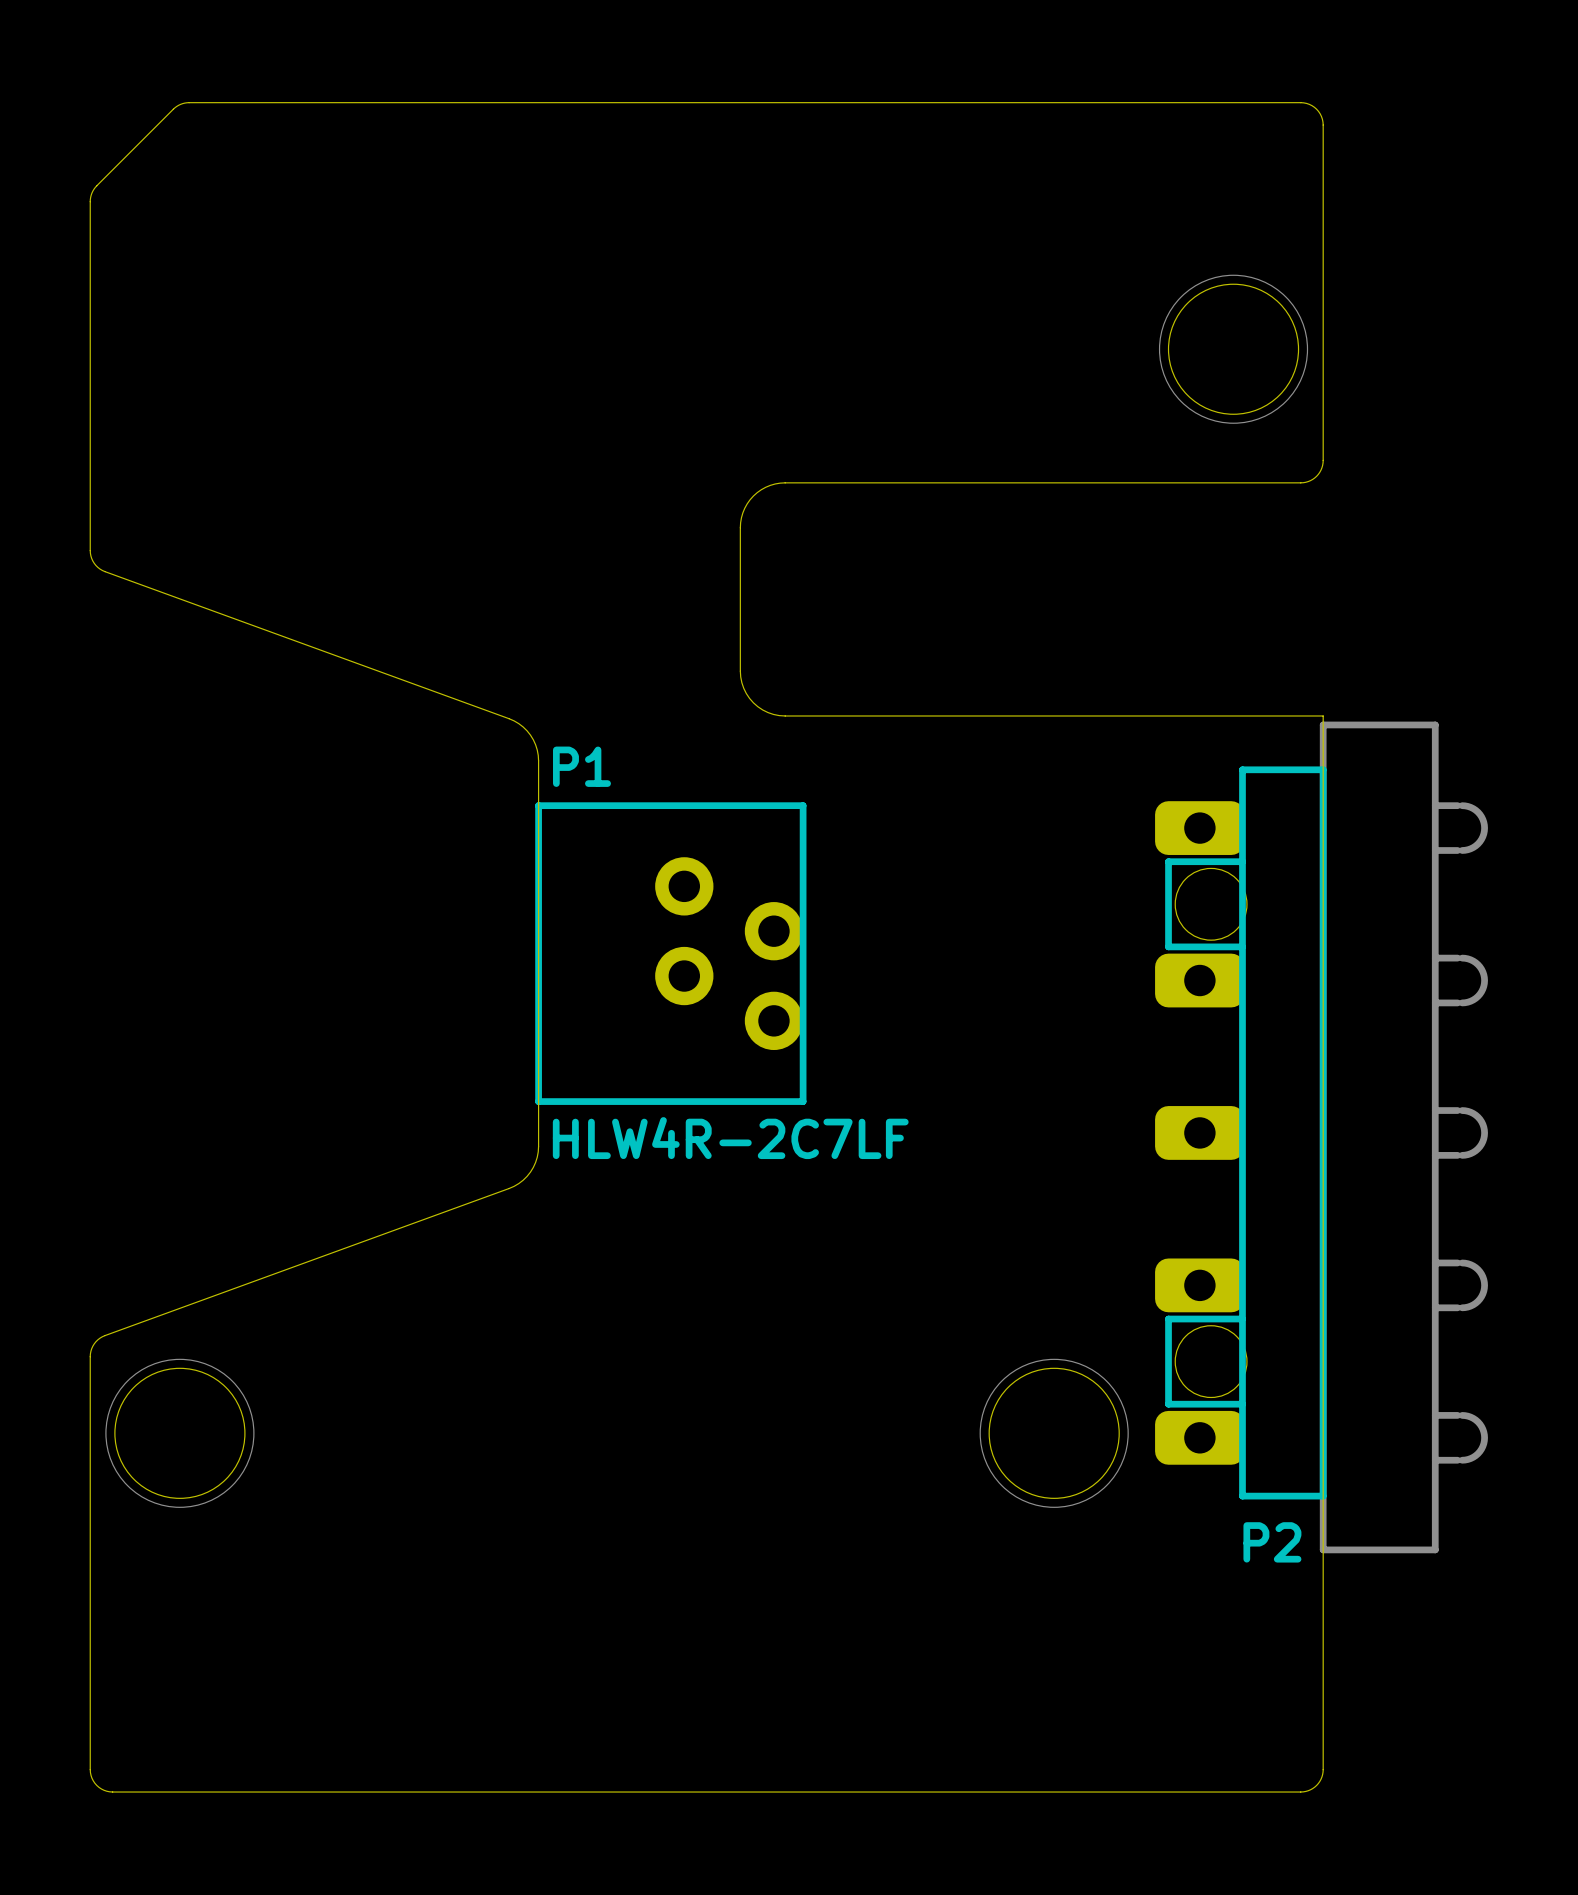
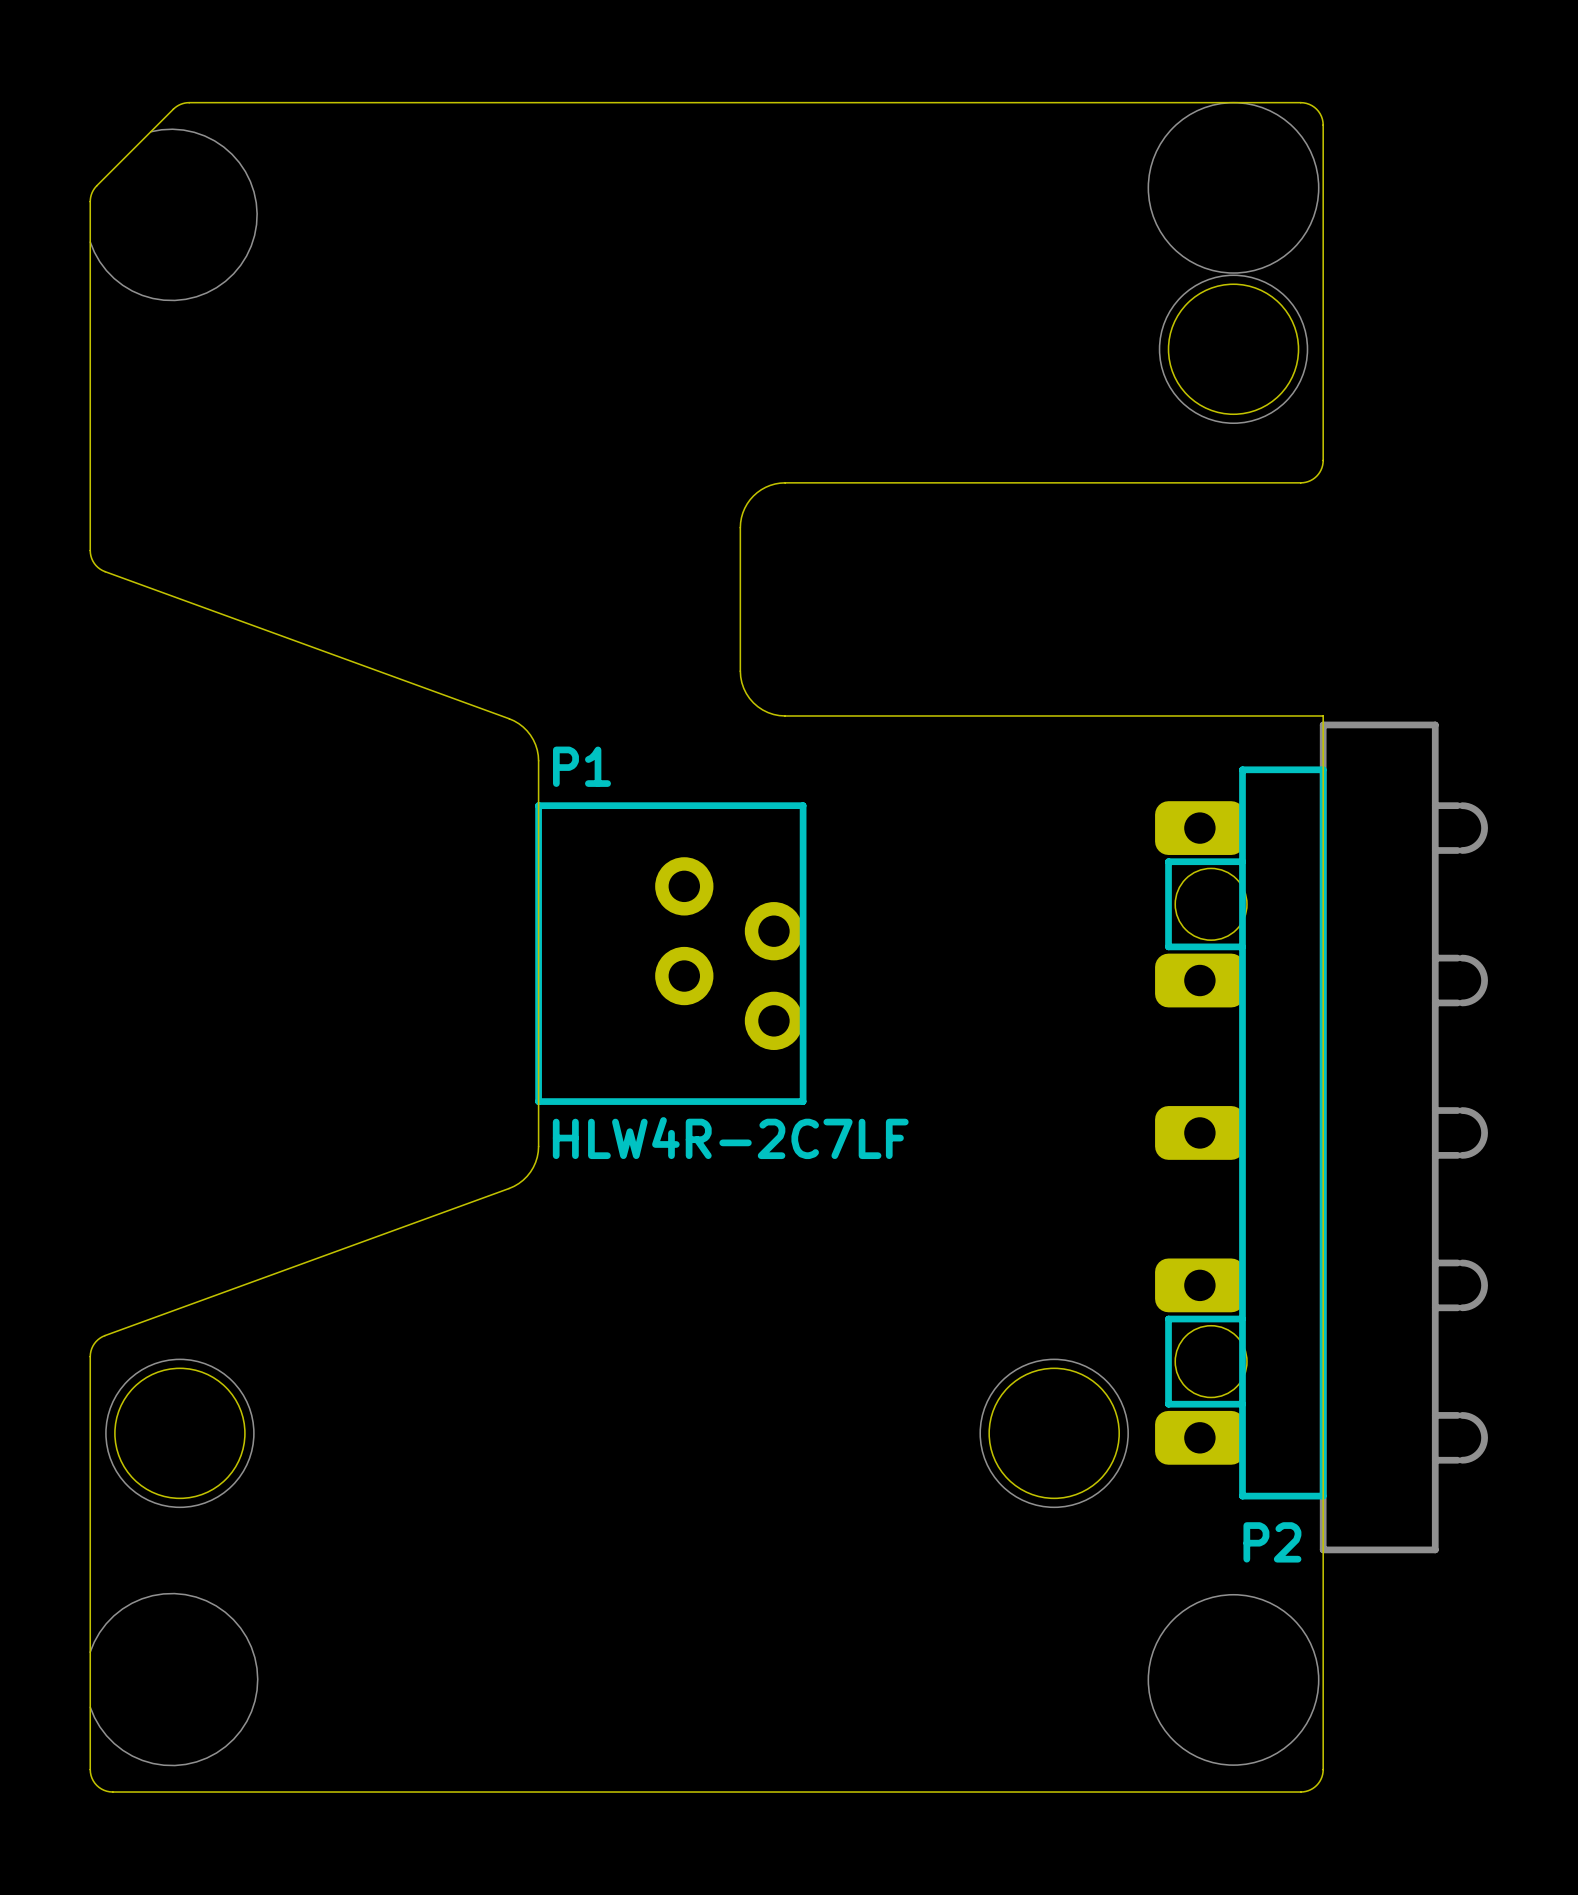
drawing: none -> [1148, 102, 1319, 274]
line: none -> (150, 131) (172, 129) (194, 132) (214, 140) (239, 162) (254, 191) (257, 213) (254, 235) (246, 256) (233, 273) (216, 287) (185, 299) (163, 300) (132, 291) (114, 278) (99, 261) (90, 242)
drawing: none -> [1148, 1594, 1319, 1766]
line: none -> (90, 1652) (99, 1632) (122, 1609) (152, 1595) (185, 1594) (206, 1600) (233, 1619) (251, 1647) (257, 1679) (251, 1711) (233, 1739) (216, 1752) (185, 1764) (163, 1765) (132, 1756) (106, 1735) (90, 1707)

